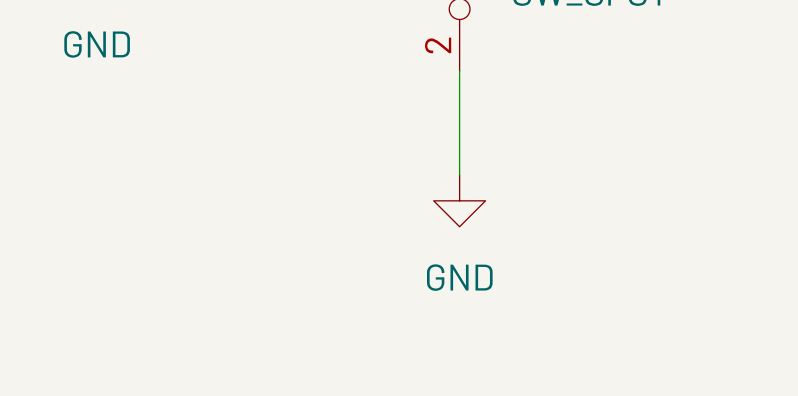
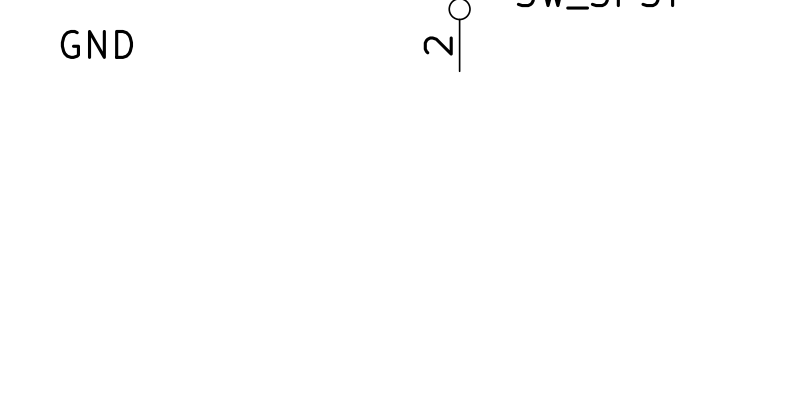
wire: (459, 71) (459, 174) -> none
power symbol: GND (459, 200) -> none

